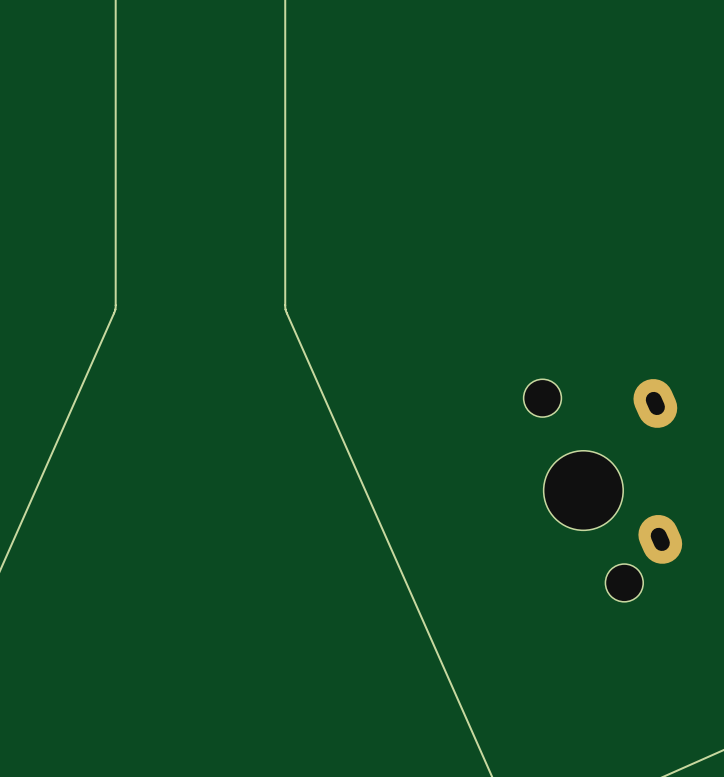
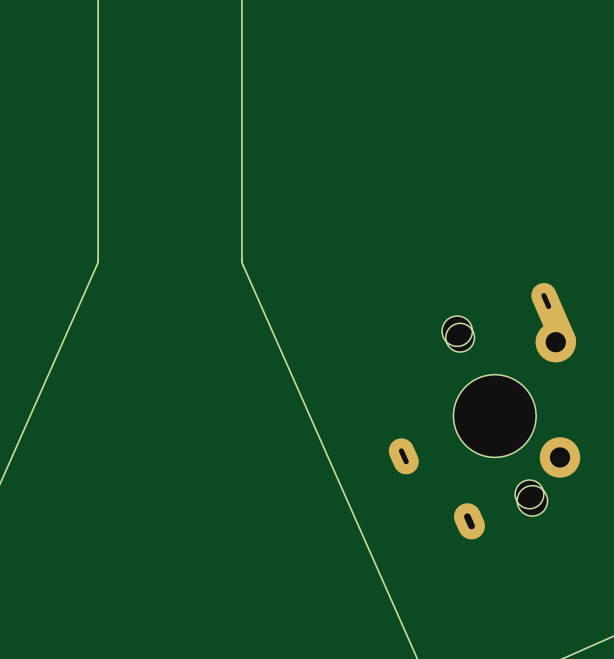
part: none -> (484, 411)
part: (602, 490) -> none

